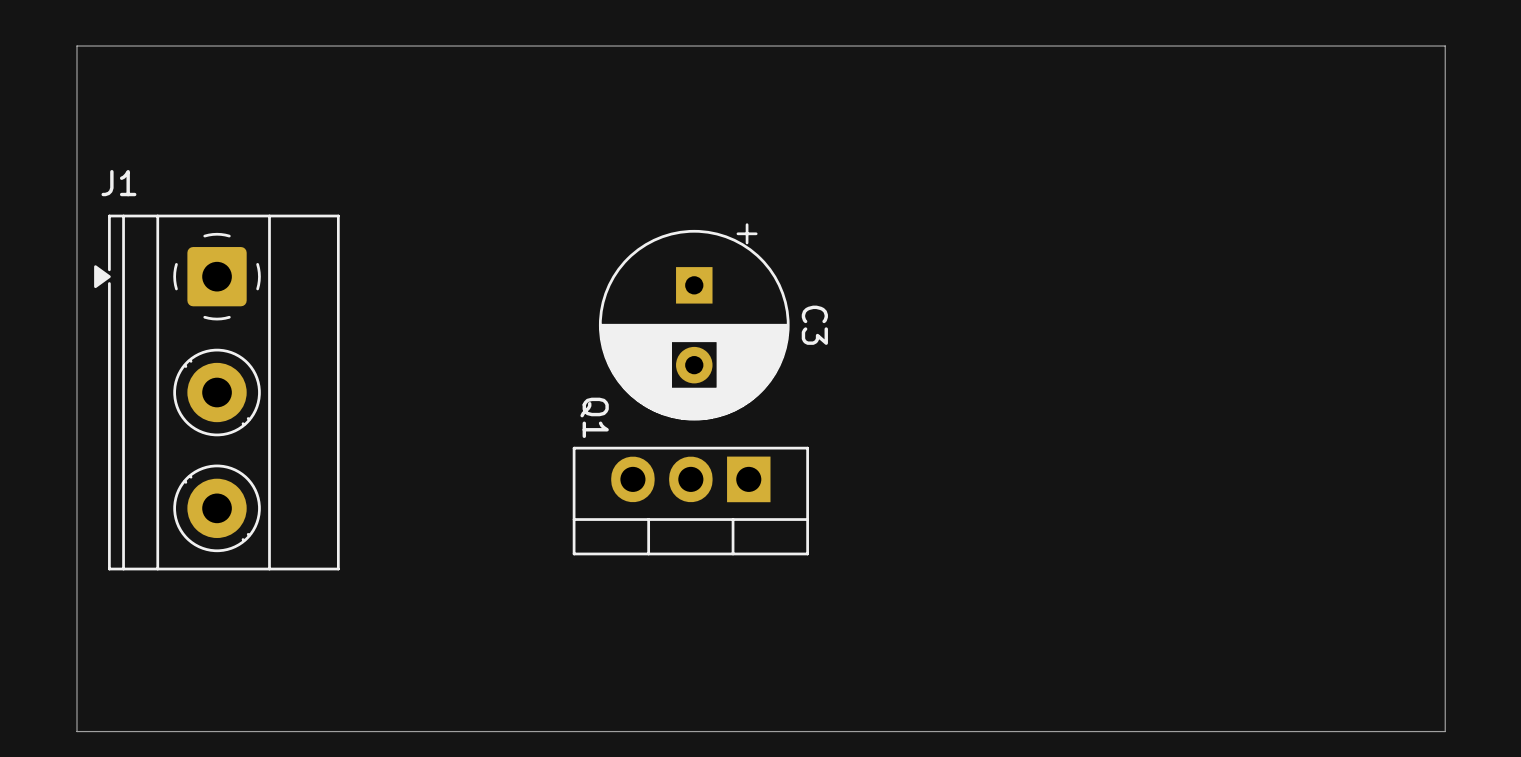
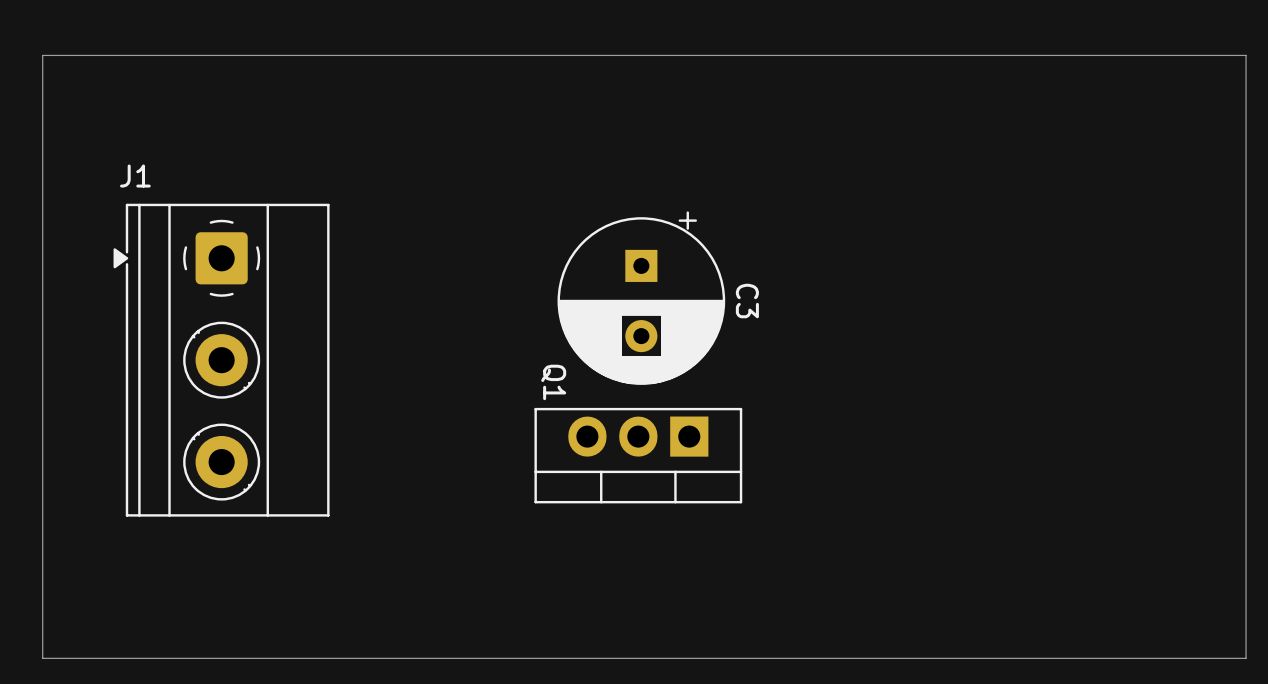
C3 position: (694, 321) -> (641, 298)
J1 position: (216, 392) -> (221, 360)
Q1 position: (690, 501) -> (638, 455)

